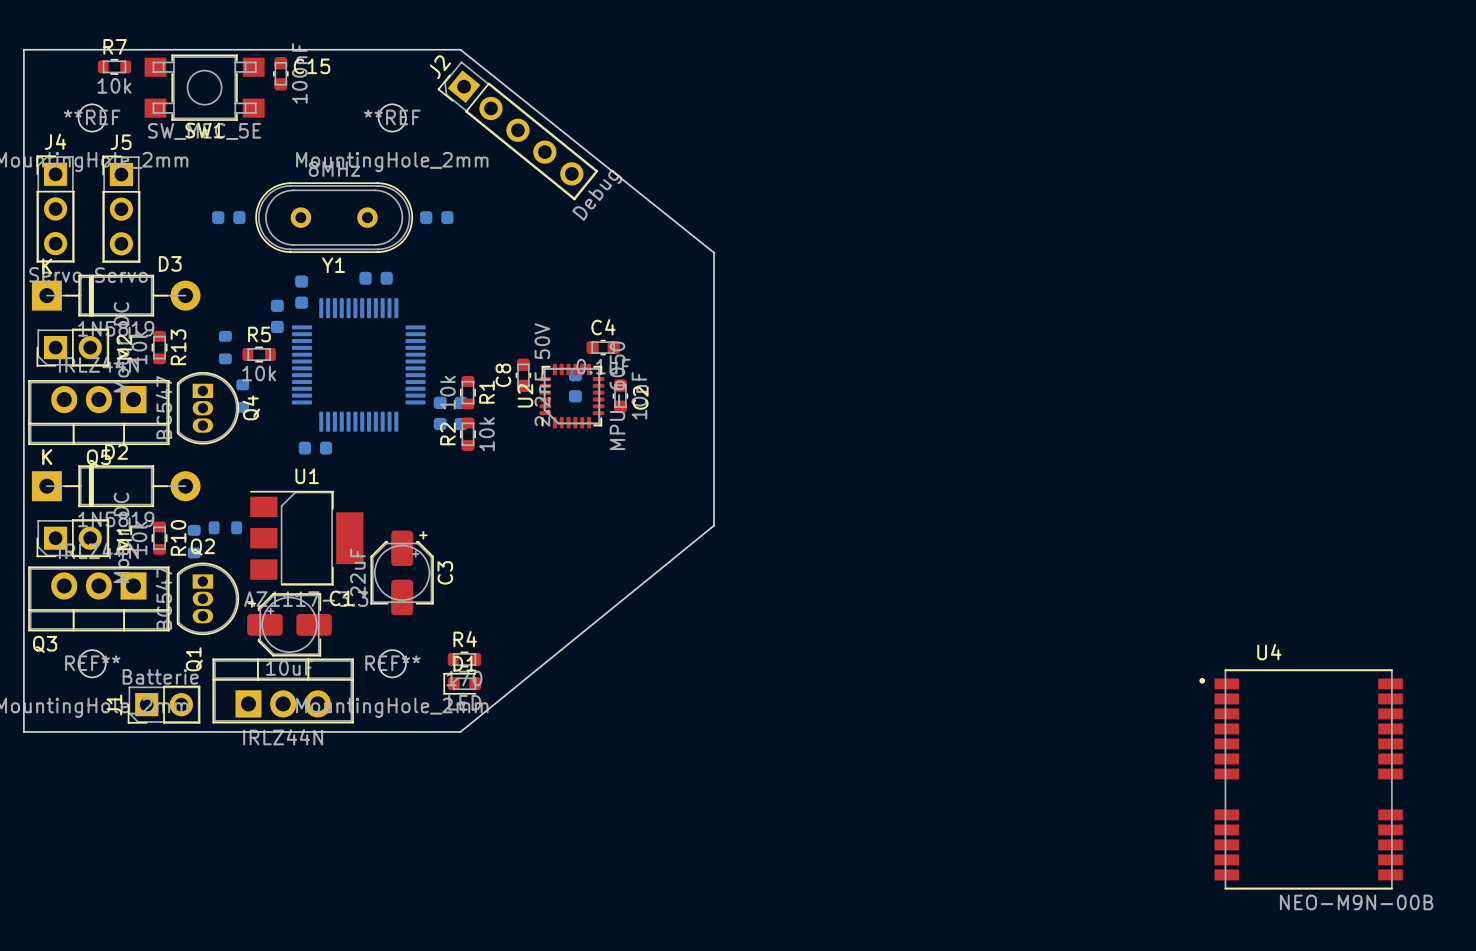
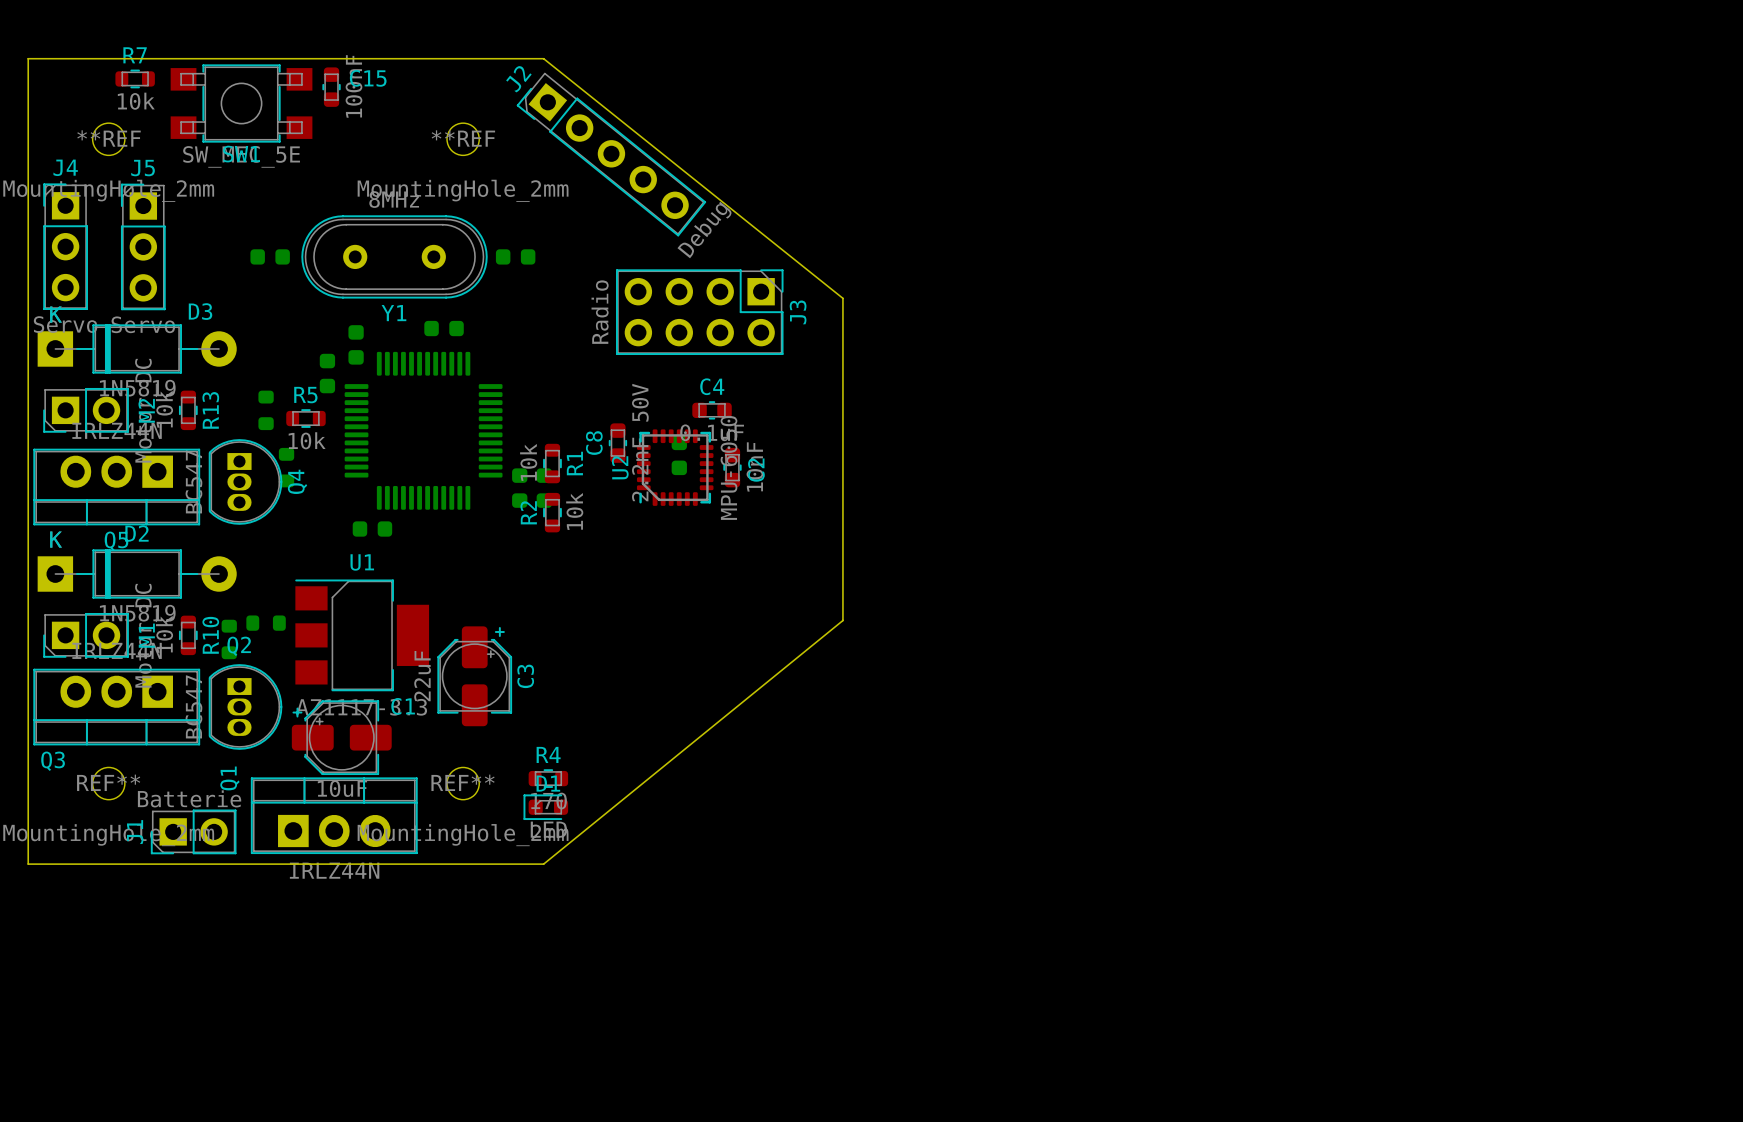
J3: none -> Radio (699, 312)
U4: NEO-M9N-00B (1301, 779) -> none

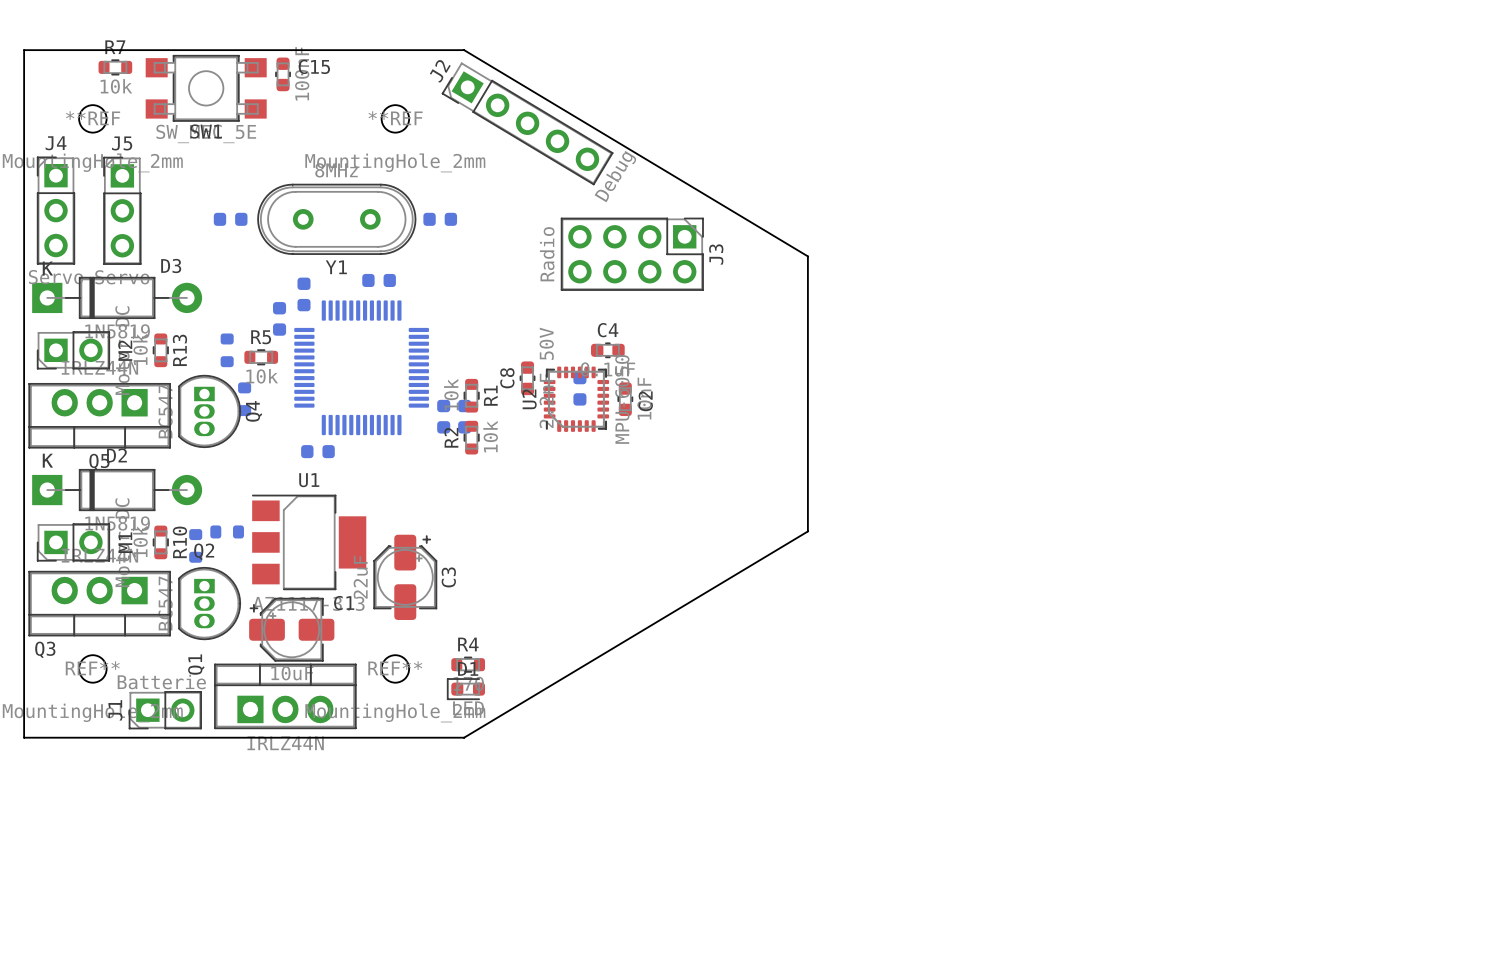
board edge: (543, 58) (842, 298) (842, 620) (543, 864) -> (464, 50) (807, 256) (807, 531) (464, 737)
J2 rotation: 0° (611, 154) -> 8° counterclockwise (527, 123)
J3 position: (699, 312) -> (632, 254)

